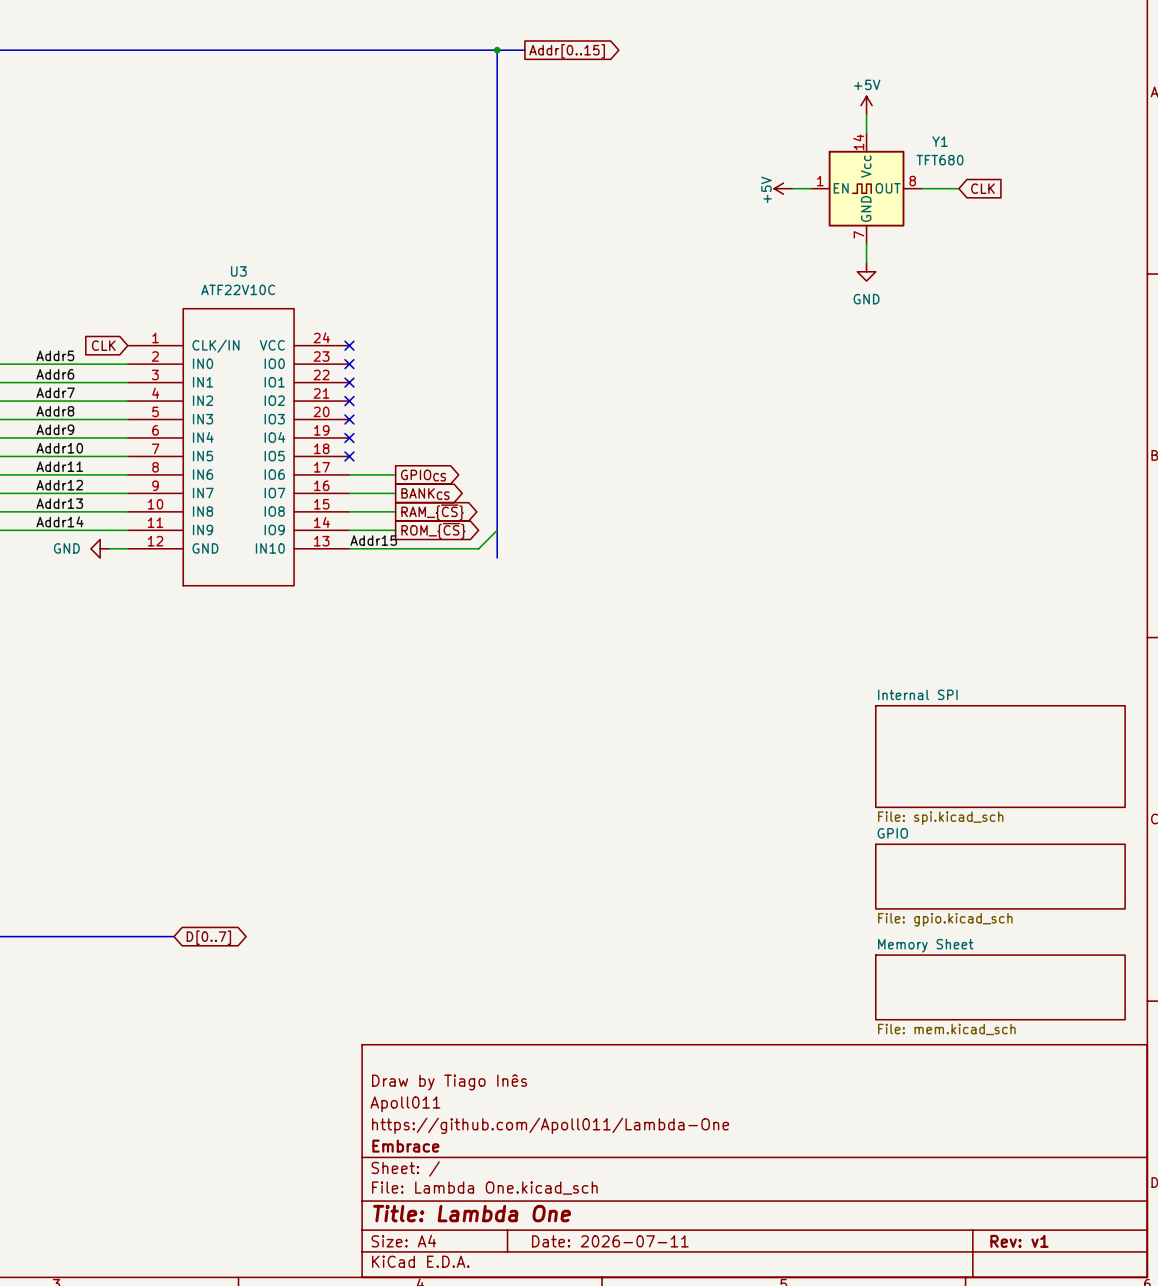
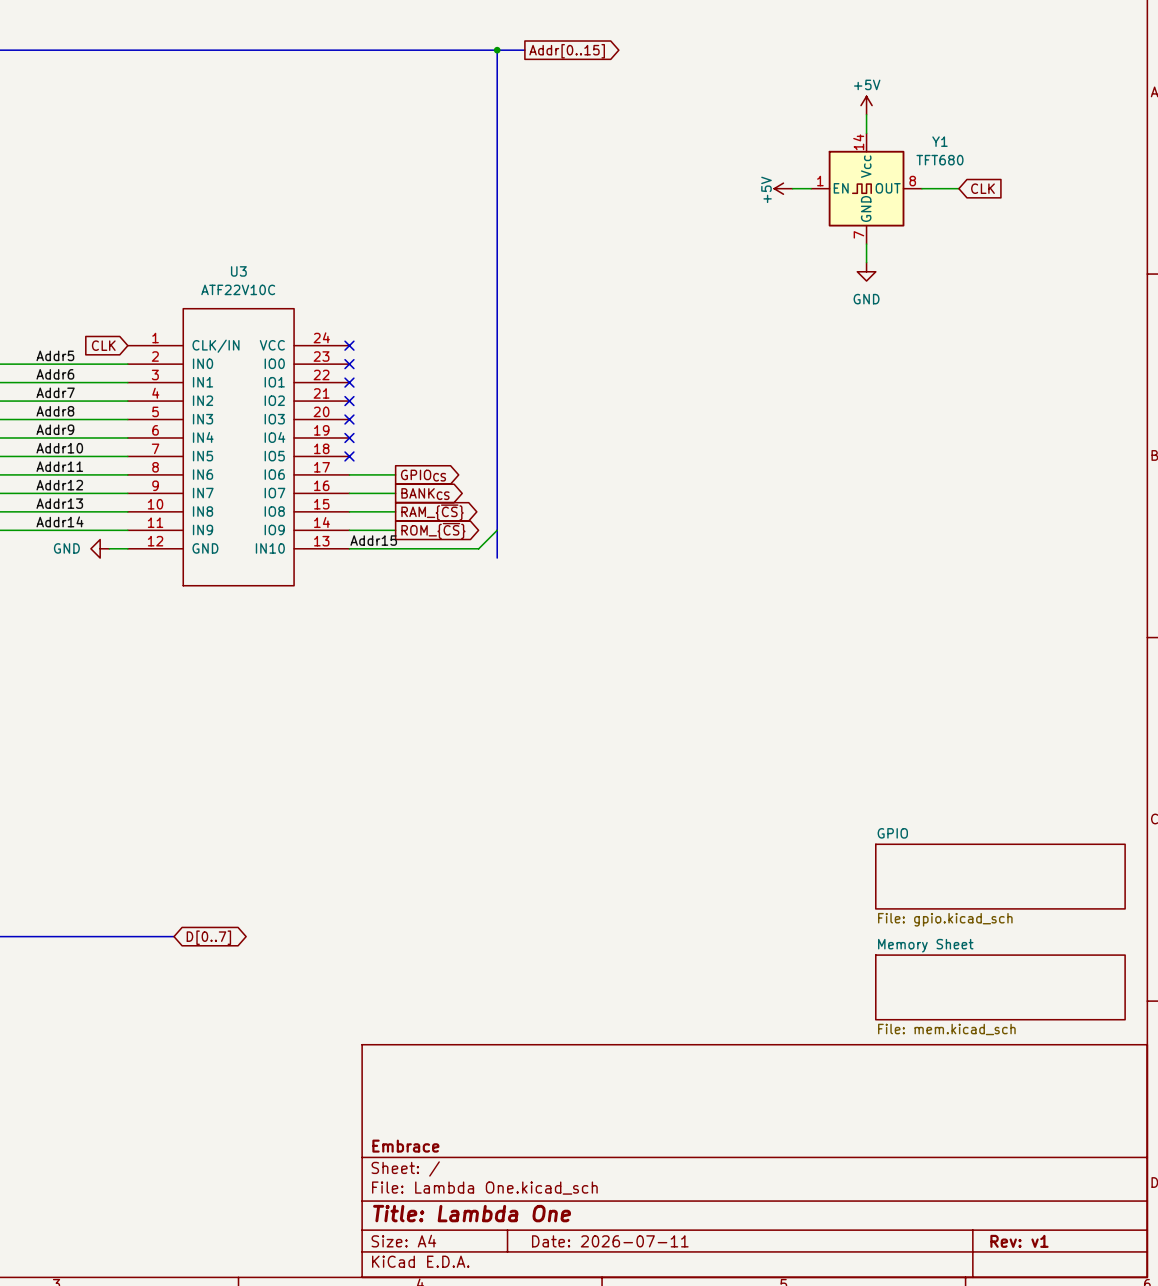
sheet Internal SPI: File: spi.kicad_sch (1000, 756) -> none
title block: Draw by Tiago Inês (449, 1082) -> none
title block: Apoll011 (405, 1104) -> none
title block: https://github.com/Apoll011/Lambda-One (550, 1125) -> none

